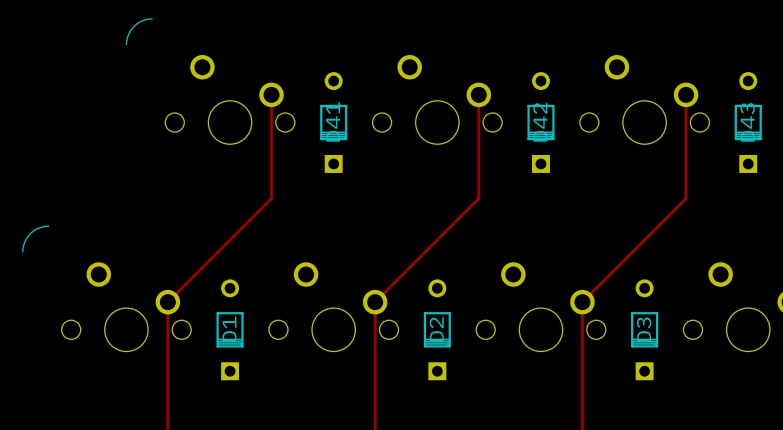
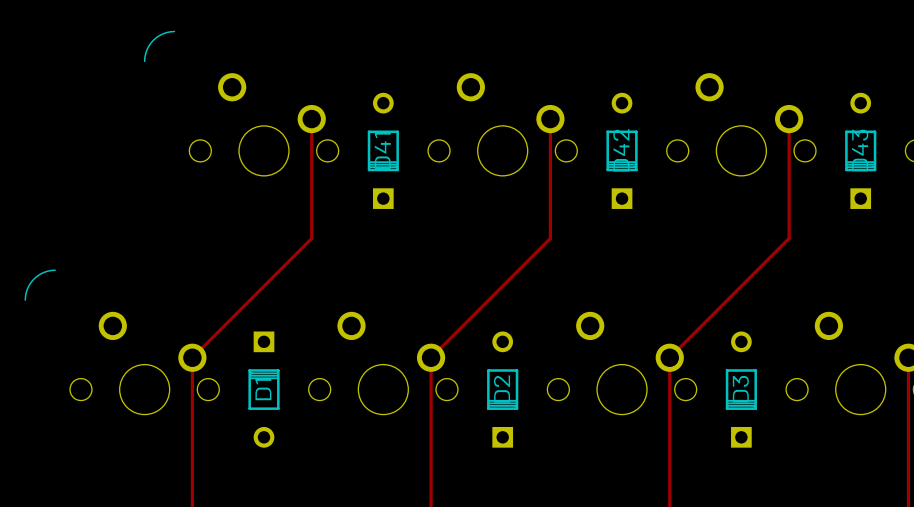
D1 rotation: 0° (230, 329) -> 180° (263, 389)

